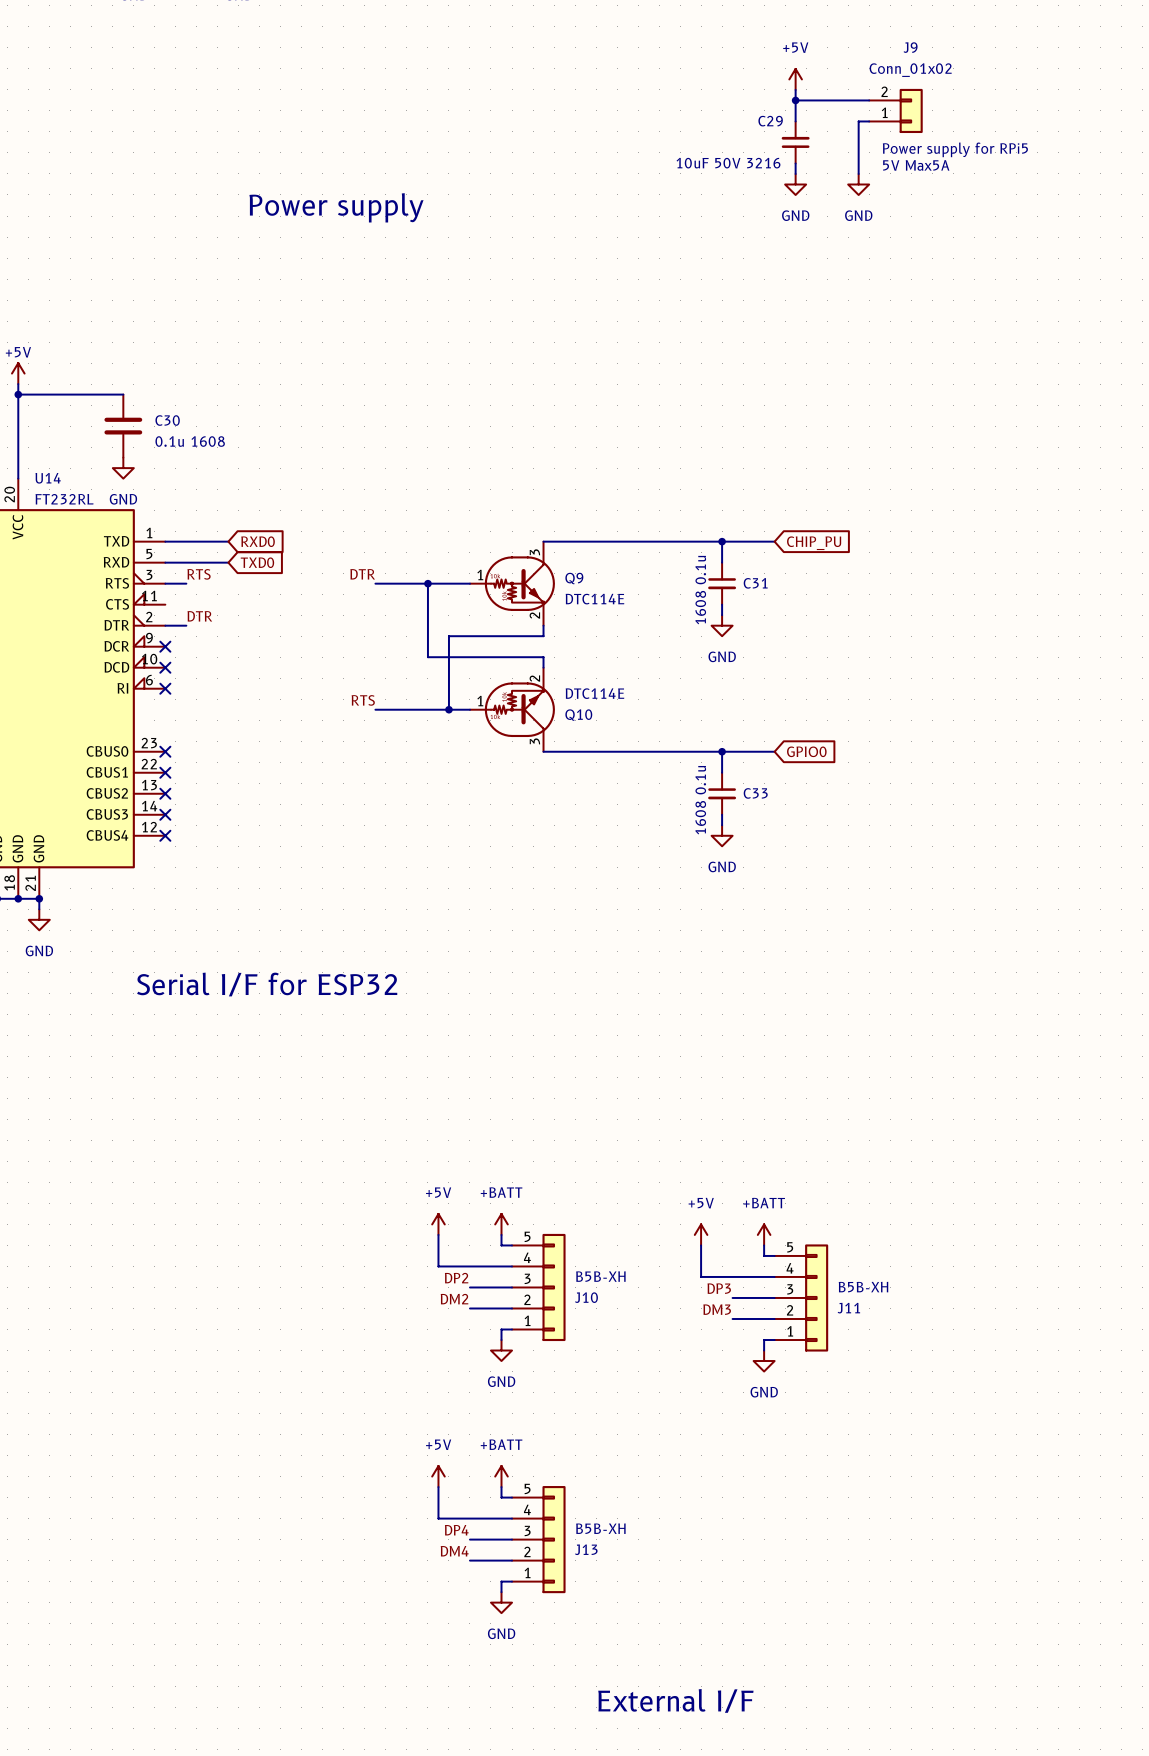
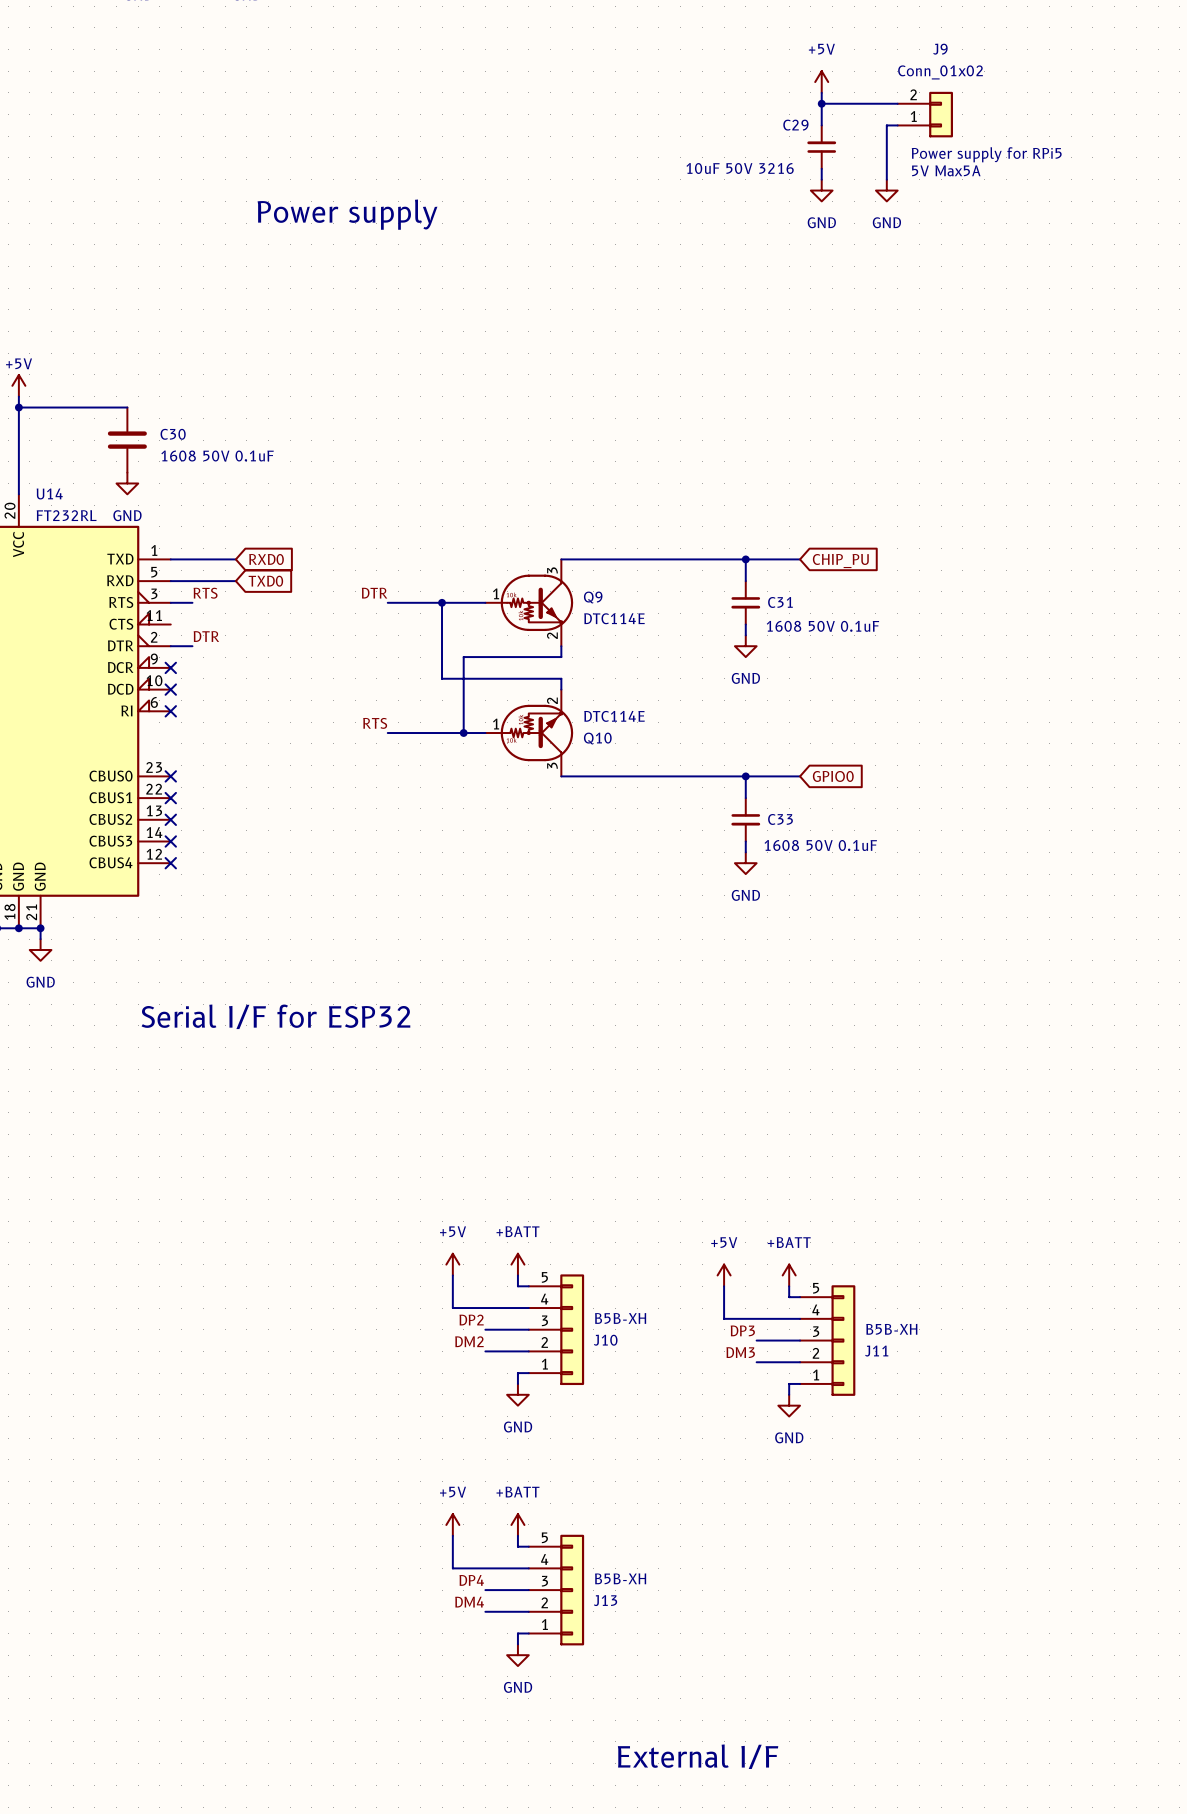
C29 value: none -> 10uF 50V 3216 (740, 168)
C29 text: 10uF 50V 3216 (728, 163) -> none
C30 value: 0.1u 1608 (190, 441) -> 1608 50V 0.1uF (217, 456)
C31 value: 1608 0.1u (700, 590) -> 1608 50V 0.1uF (822, 626)
C33 value: 1608 0.1u (700, 800) -> 1608 50V 0.1uF (820, 845)

